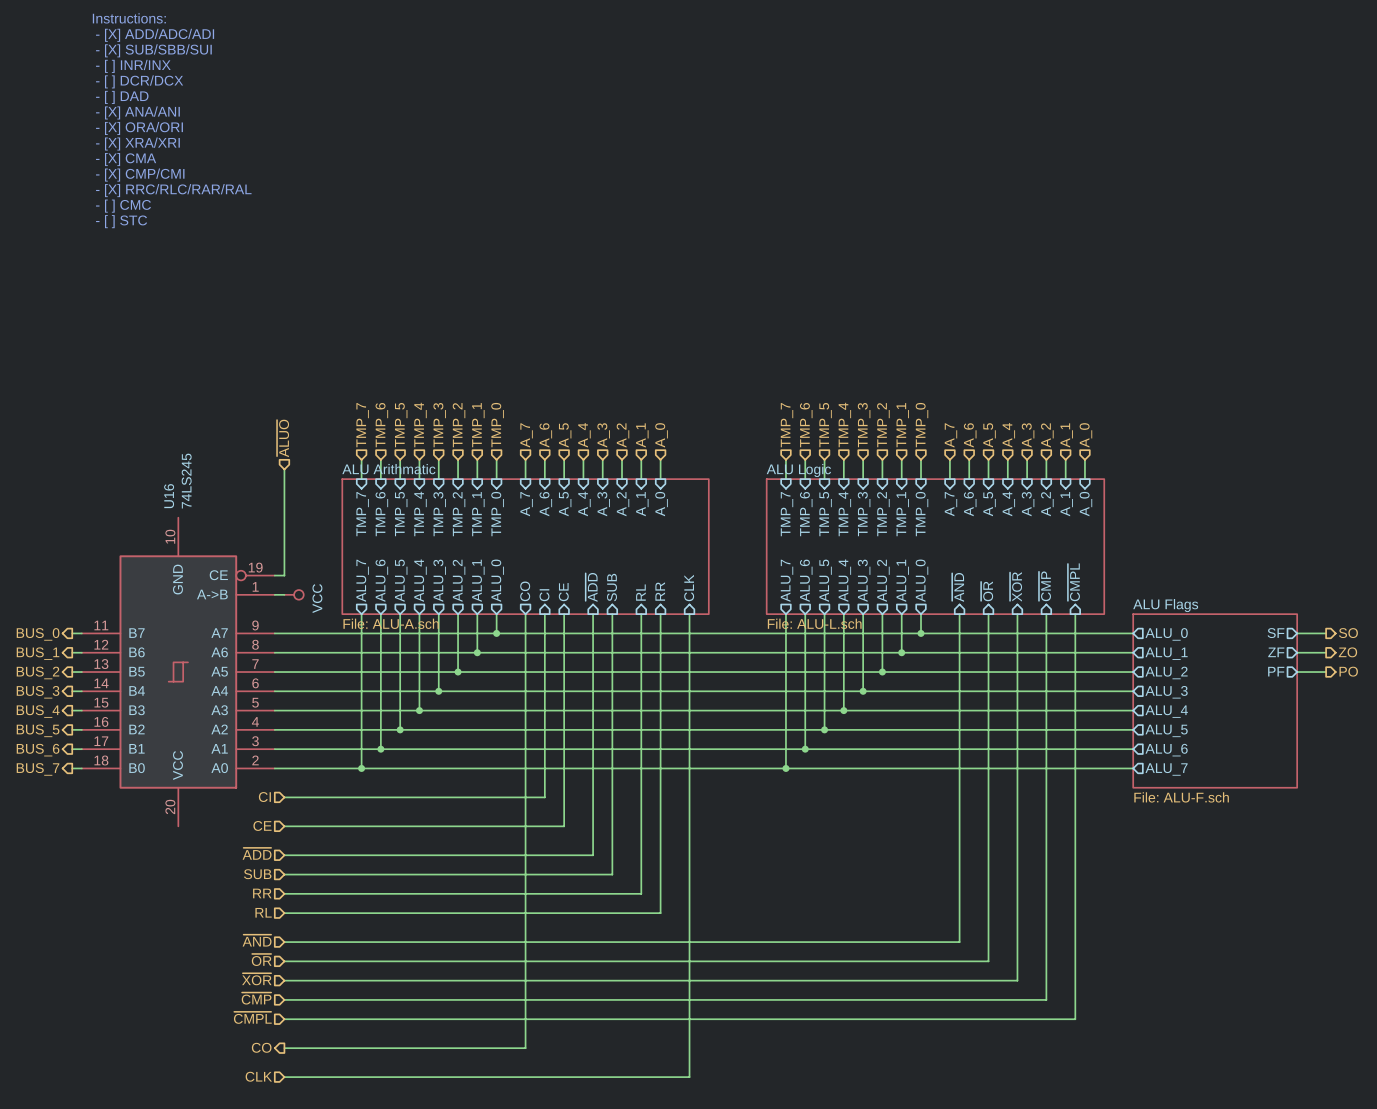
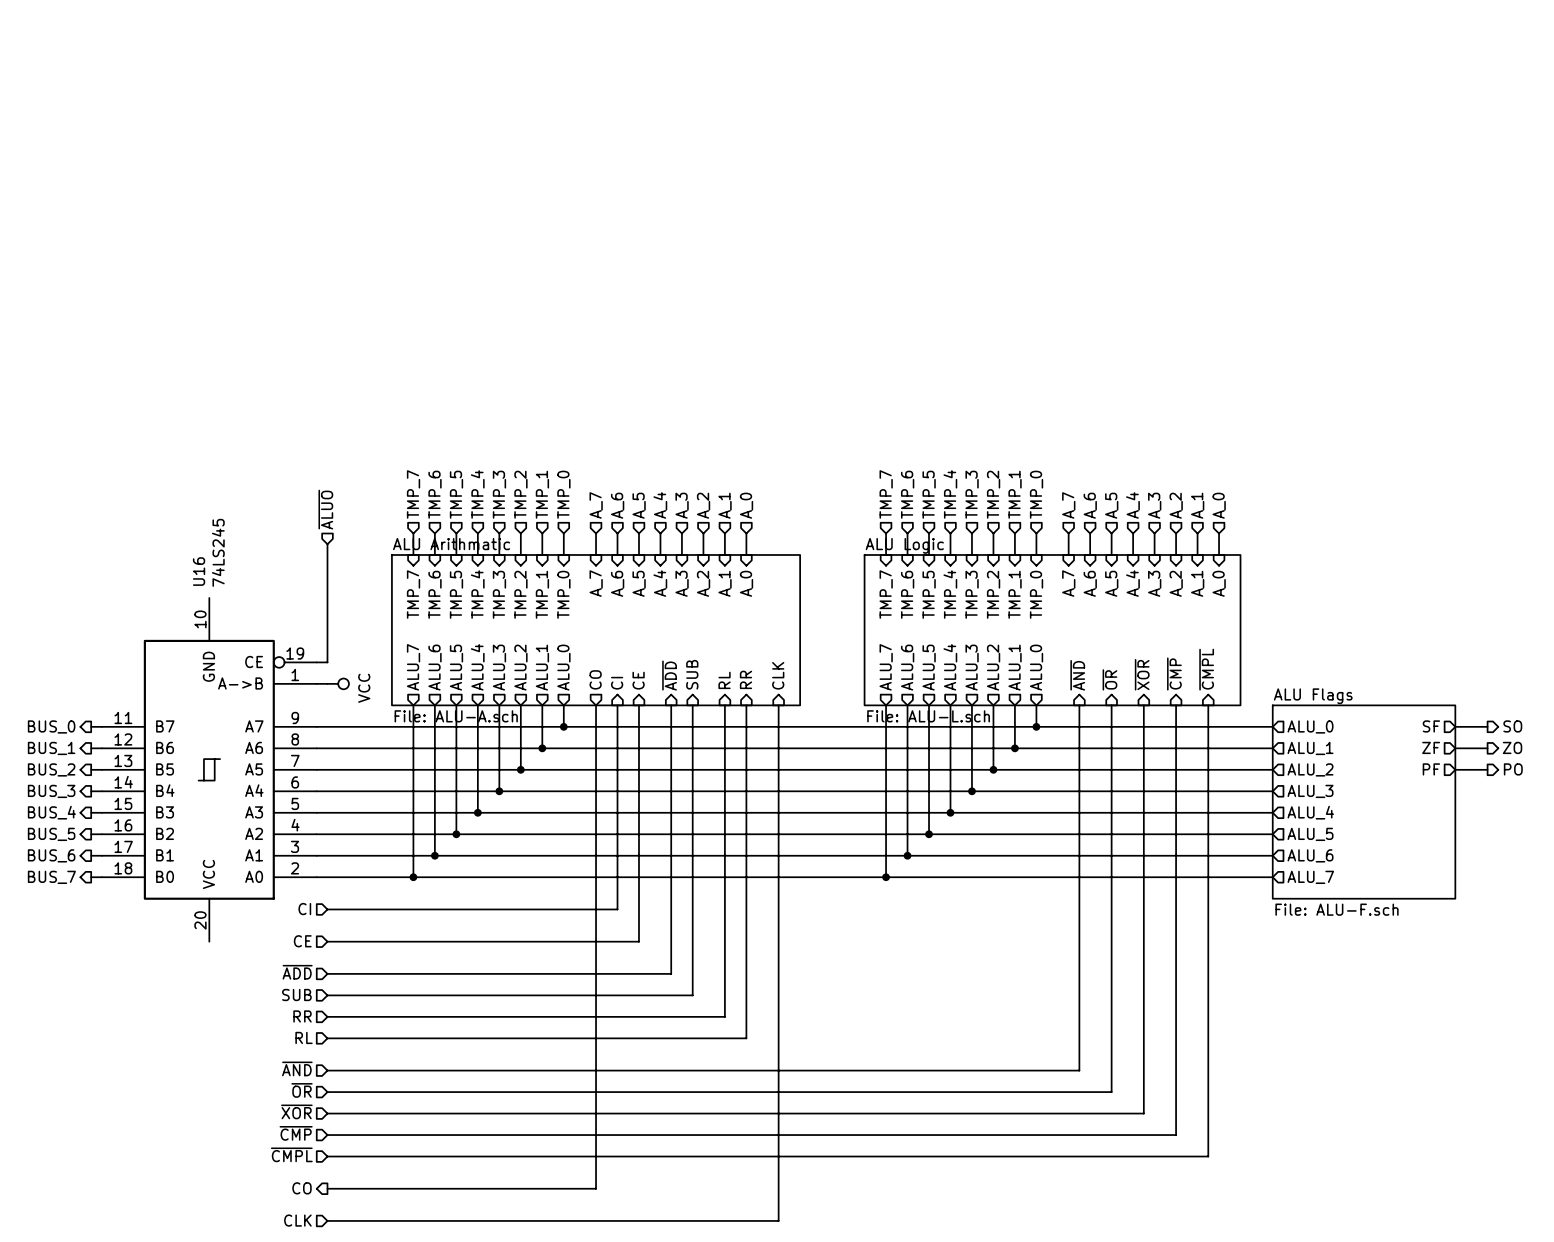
text: Instructions: (129, 18) -> none
text: - [X] ADD/ADC/ADI (155, 35) -> none
text: - [X] SUB/SBB/SUI (153, 50) -> none
text: - [ ] INR/INX (133, 66) -> none
text: - [ ] DCR/DCX (139, 81) -> none
text: - [ ] DAD (122, 97) -> none
text: - [X] ANA/ANI (137, 112) -> none
text: - [X] ORA/ORI (139, 128) -> none
text: - [X] XRA/XRI (137, 144) -> none
text: - [X] CMA (126, 159) -> none
text: - [X] CMP/CMI (140, 175) -> none
text: - [X] RRC/RLC/RAR/RAL (173, 190) -> none
text: - [ ] CMC (123, 206) -> none
text: - [ ] STC (121, 221) -> none

